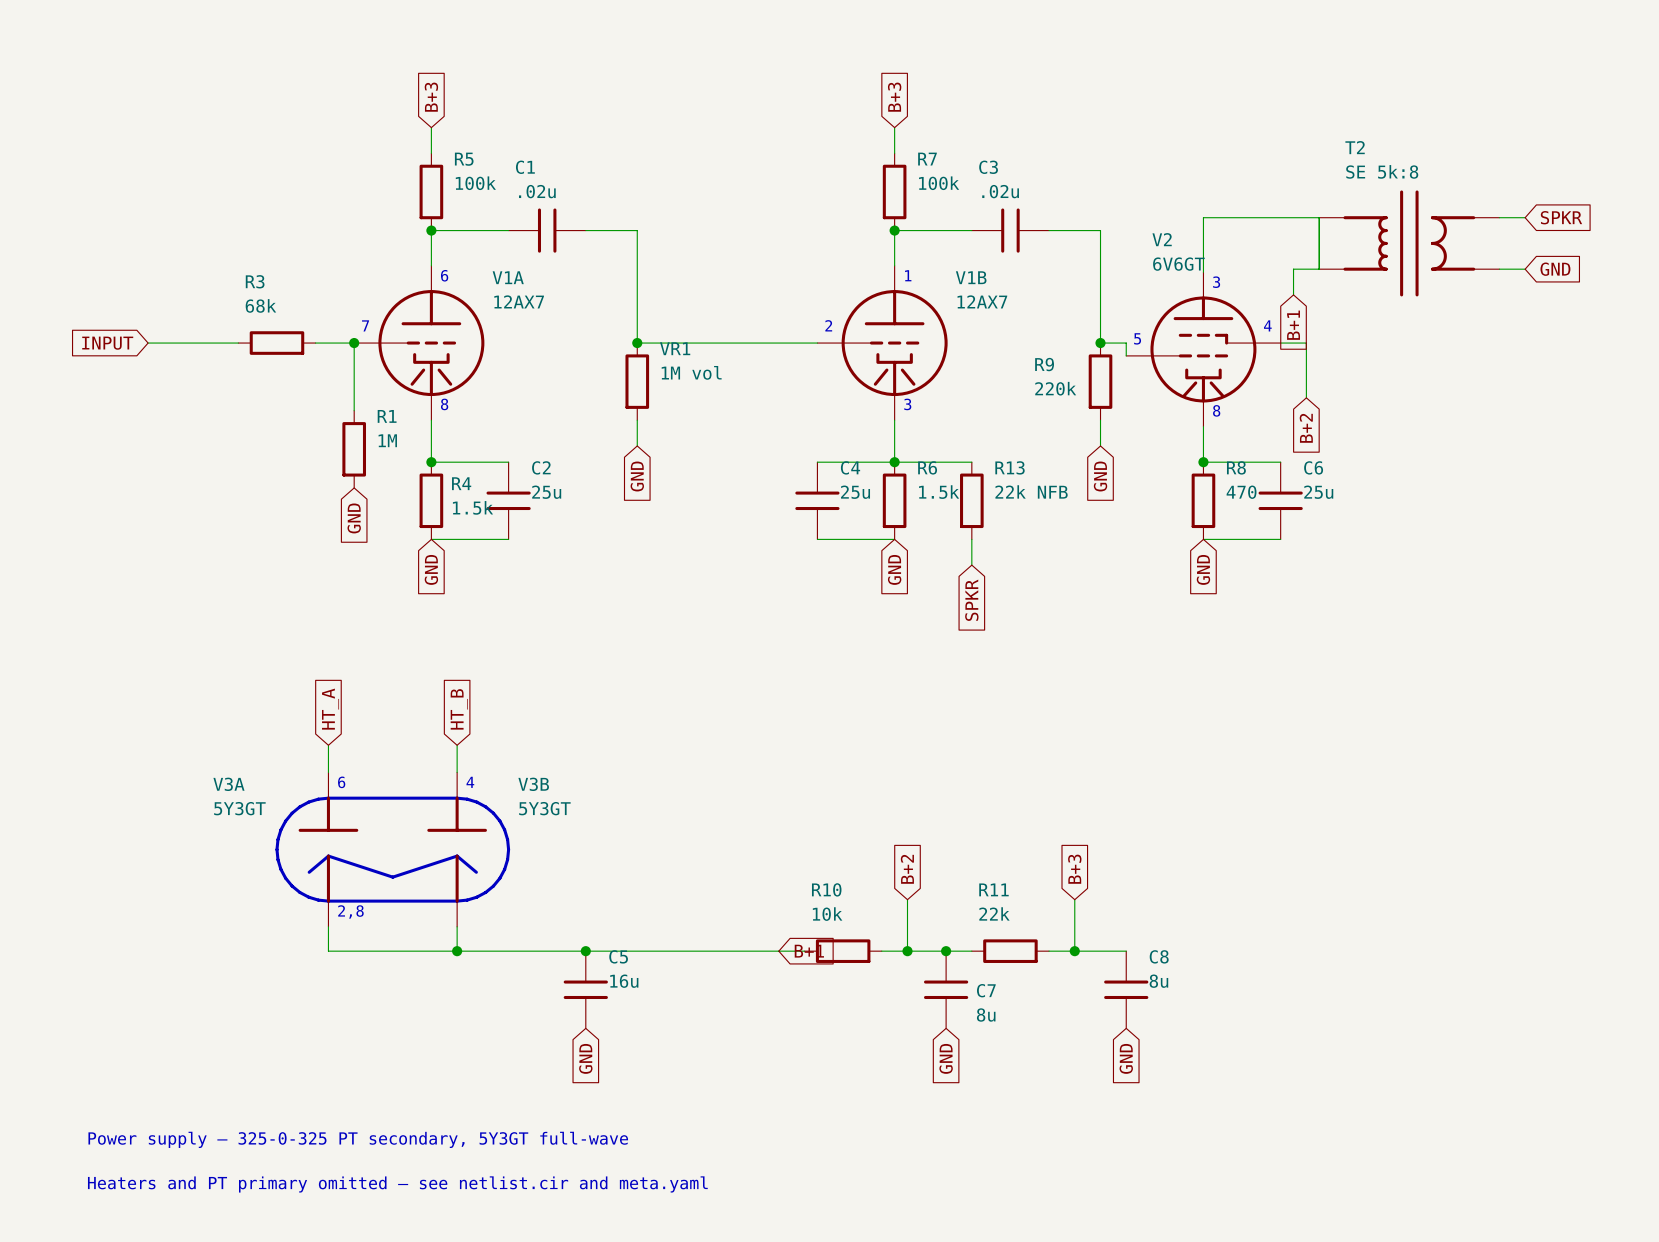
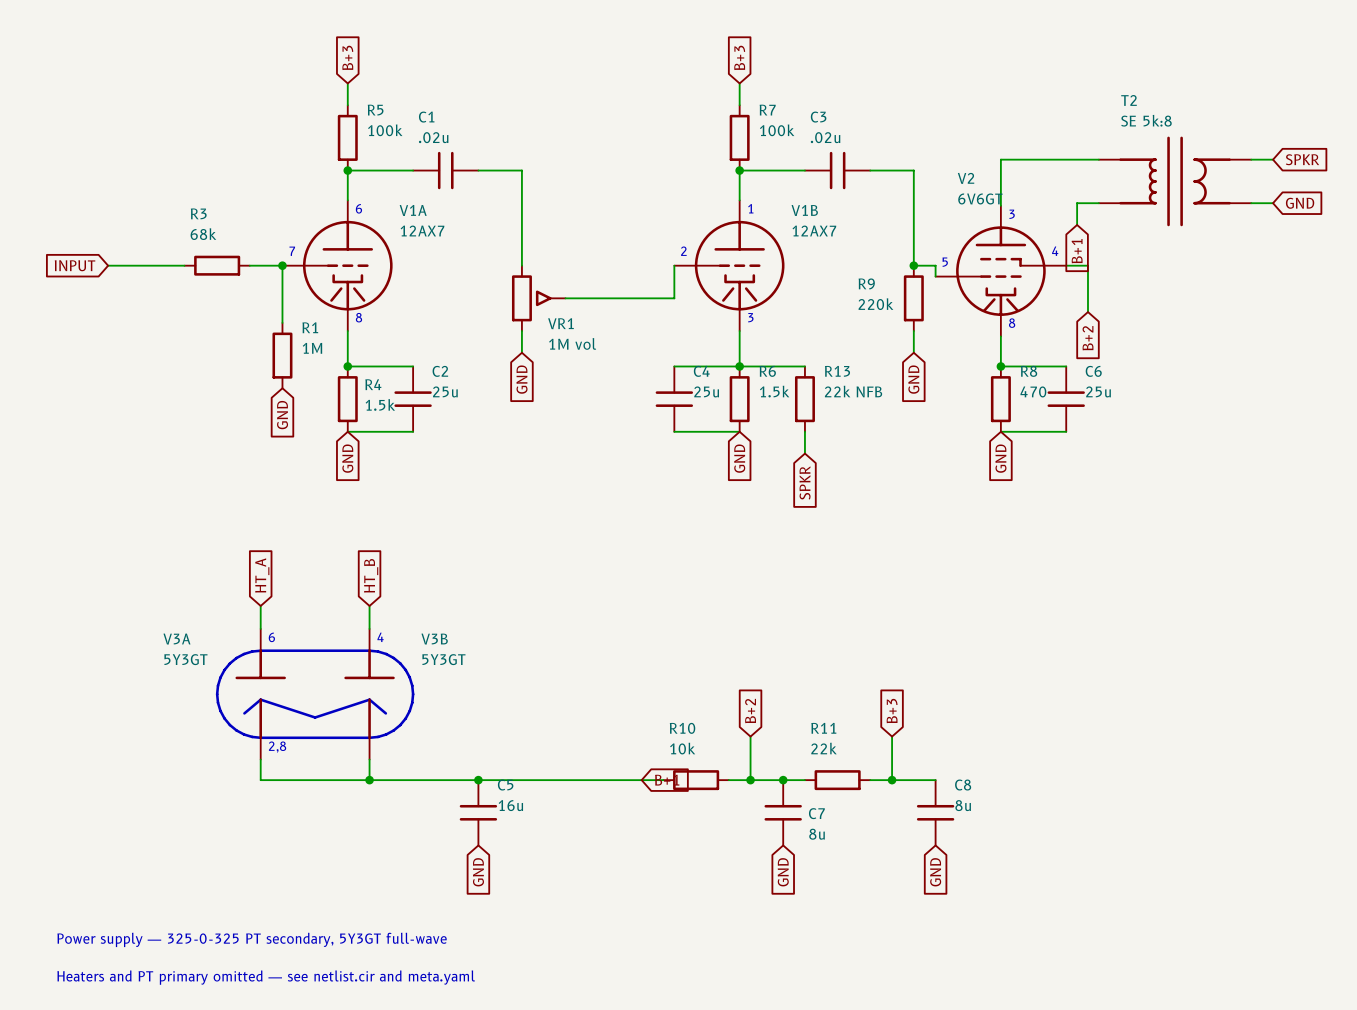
wire: (1319, 217) (1319, 269) -> none
VR1 symbol: [625, 343, 650, 421] -> [511, 265, 566, 332]
wire: (637, 343) (817, 343) -> (565, 298) (674, 298) (674, 265)
junction: (637, 343) -> none
VR1 name position: VR1 (675, 348) -> VR1 (560, 323)
VR1 value position: 1M vol (691, 372) -> 1M vol (572, 343)

